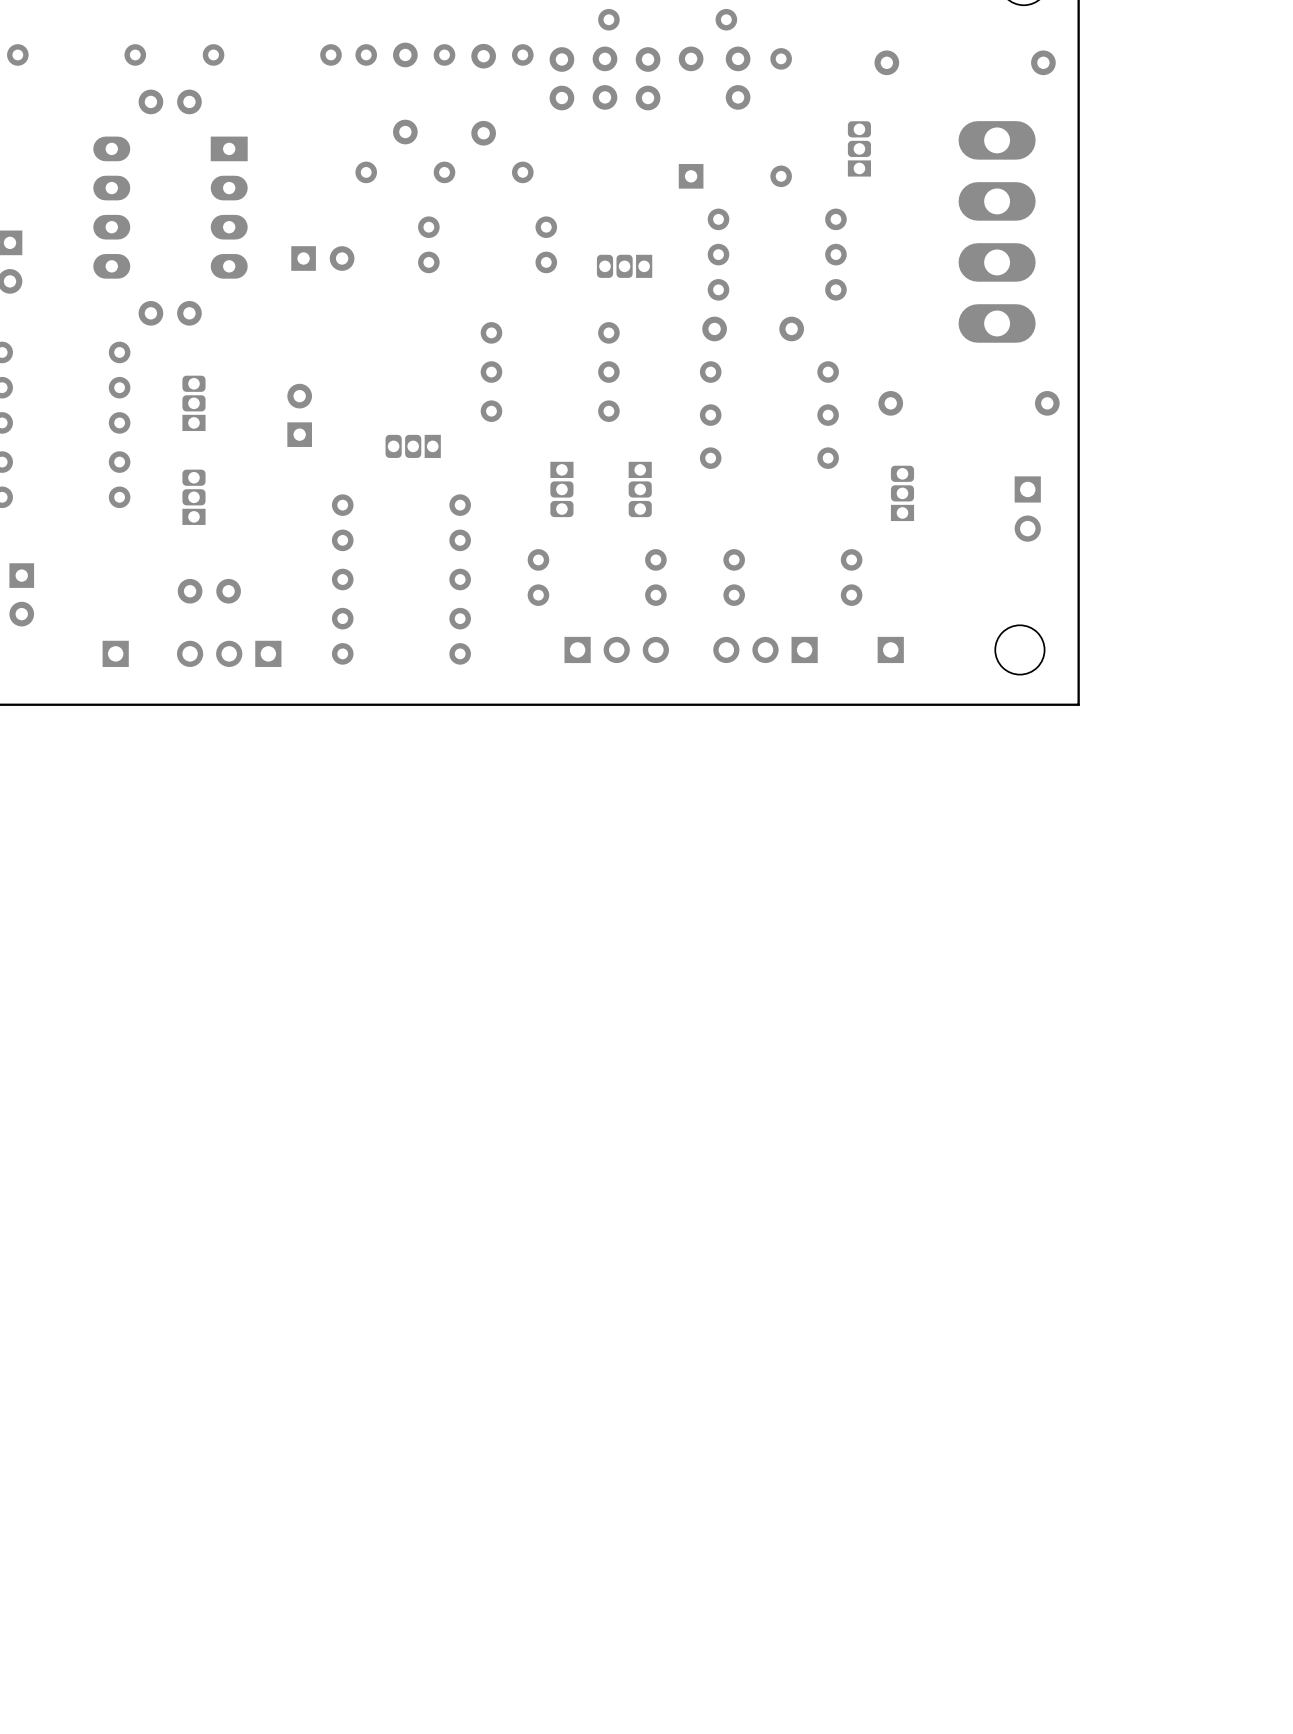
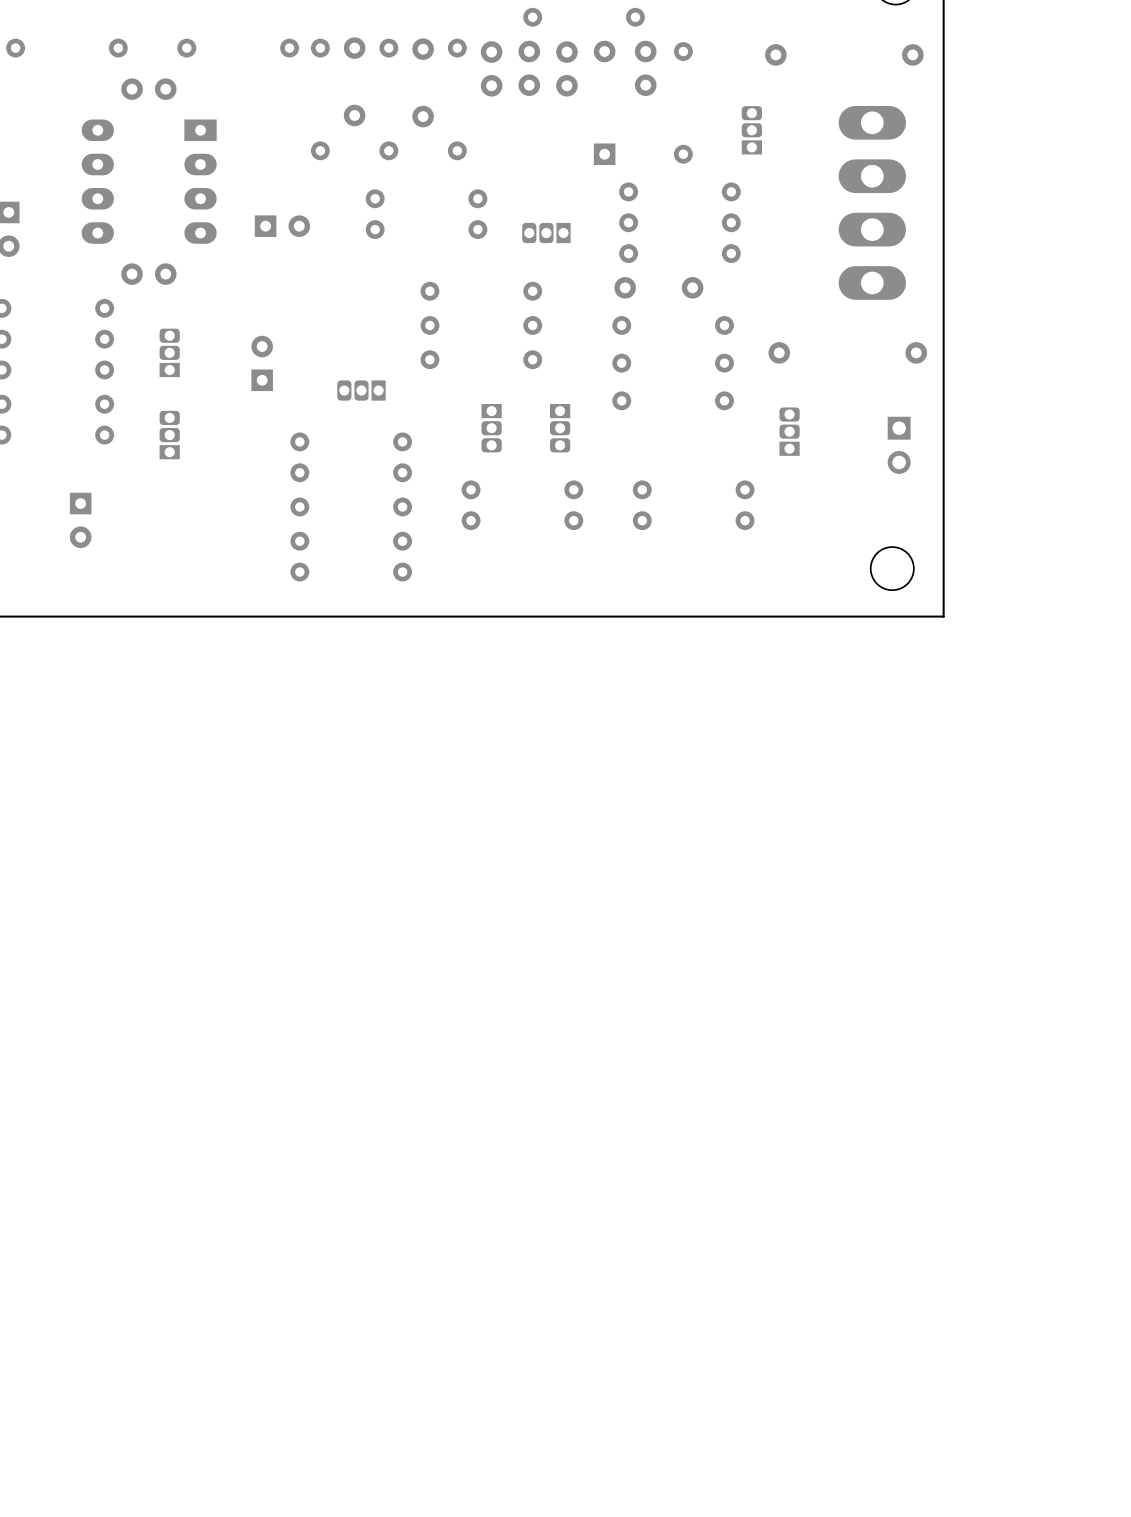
part: (209, 591) -> none
part position: (21, 594) -> (80, 520)
part: (616, 649) -> none
part: (765, 649) -> none
part: (890, 649) -> none
part: (115, 653) -> none
part: (229, 653) -> none

